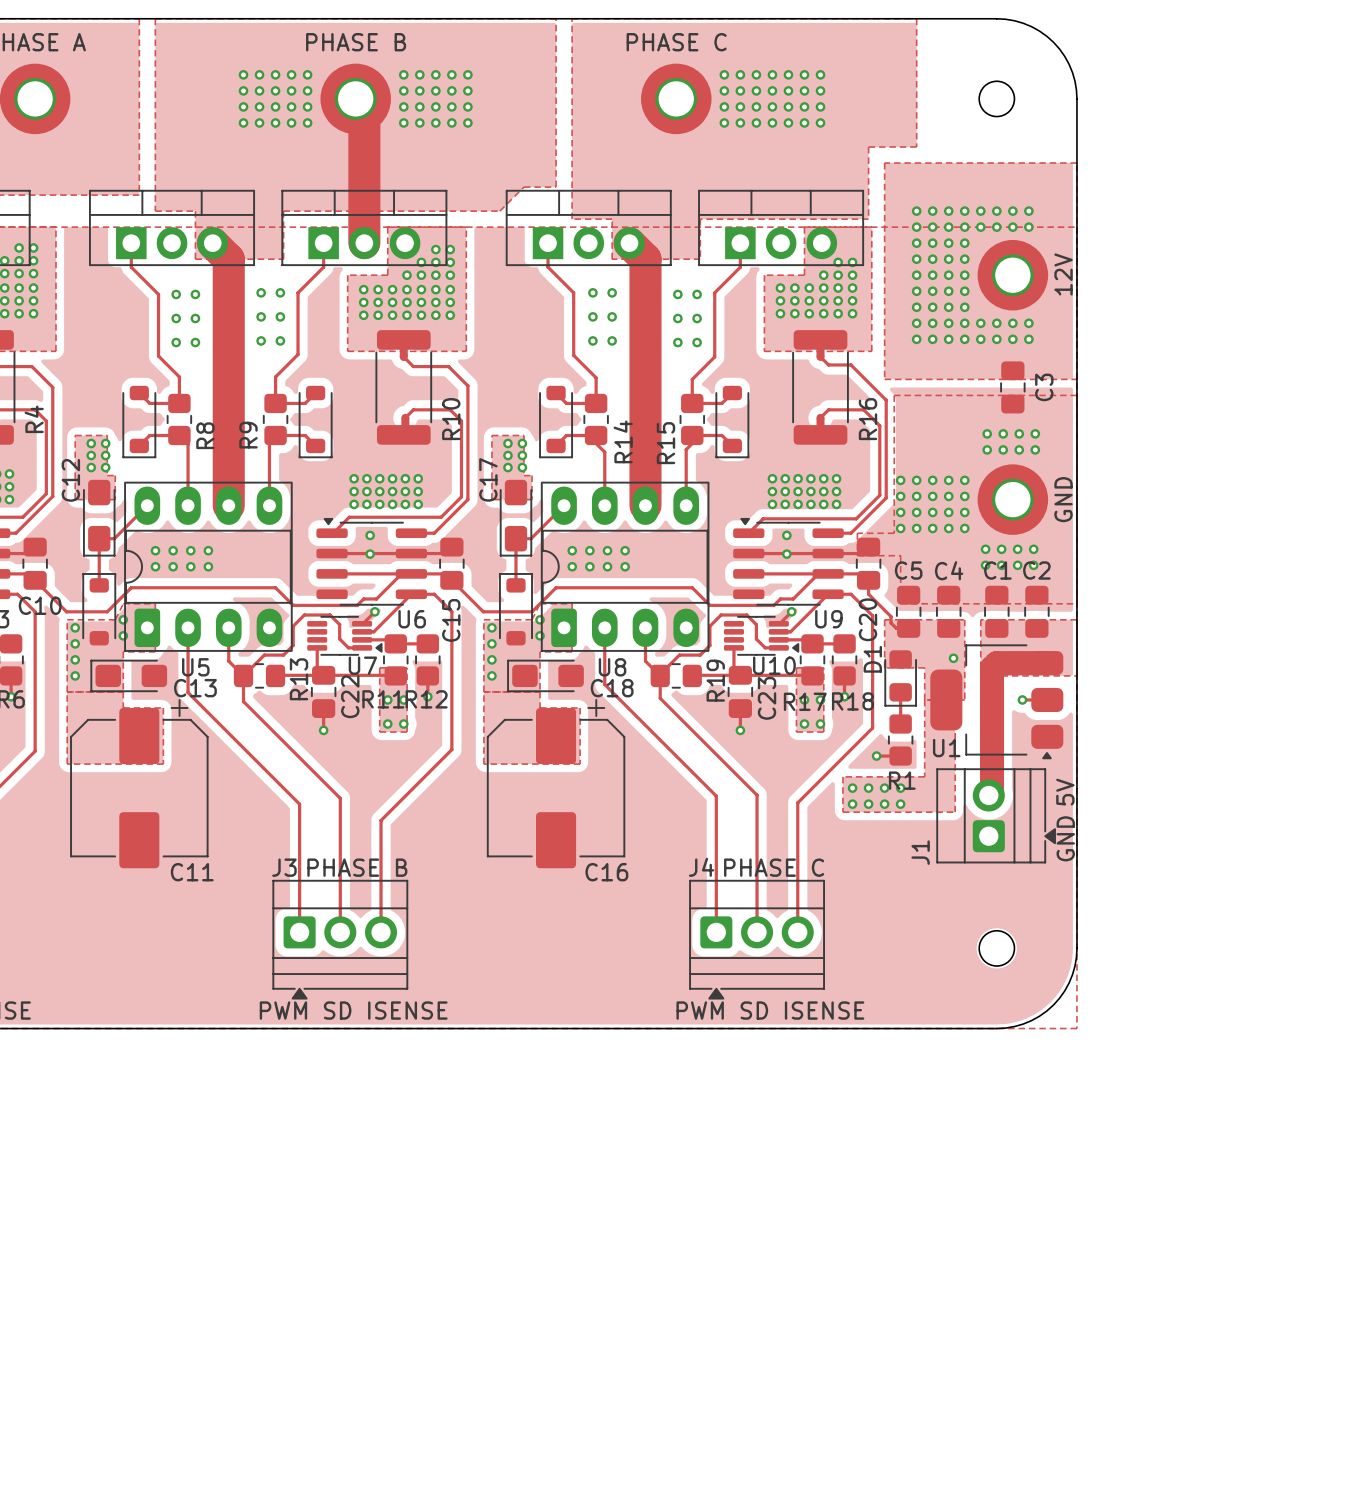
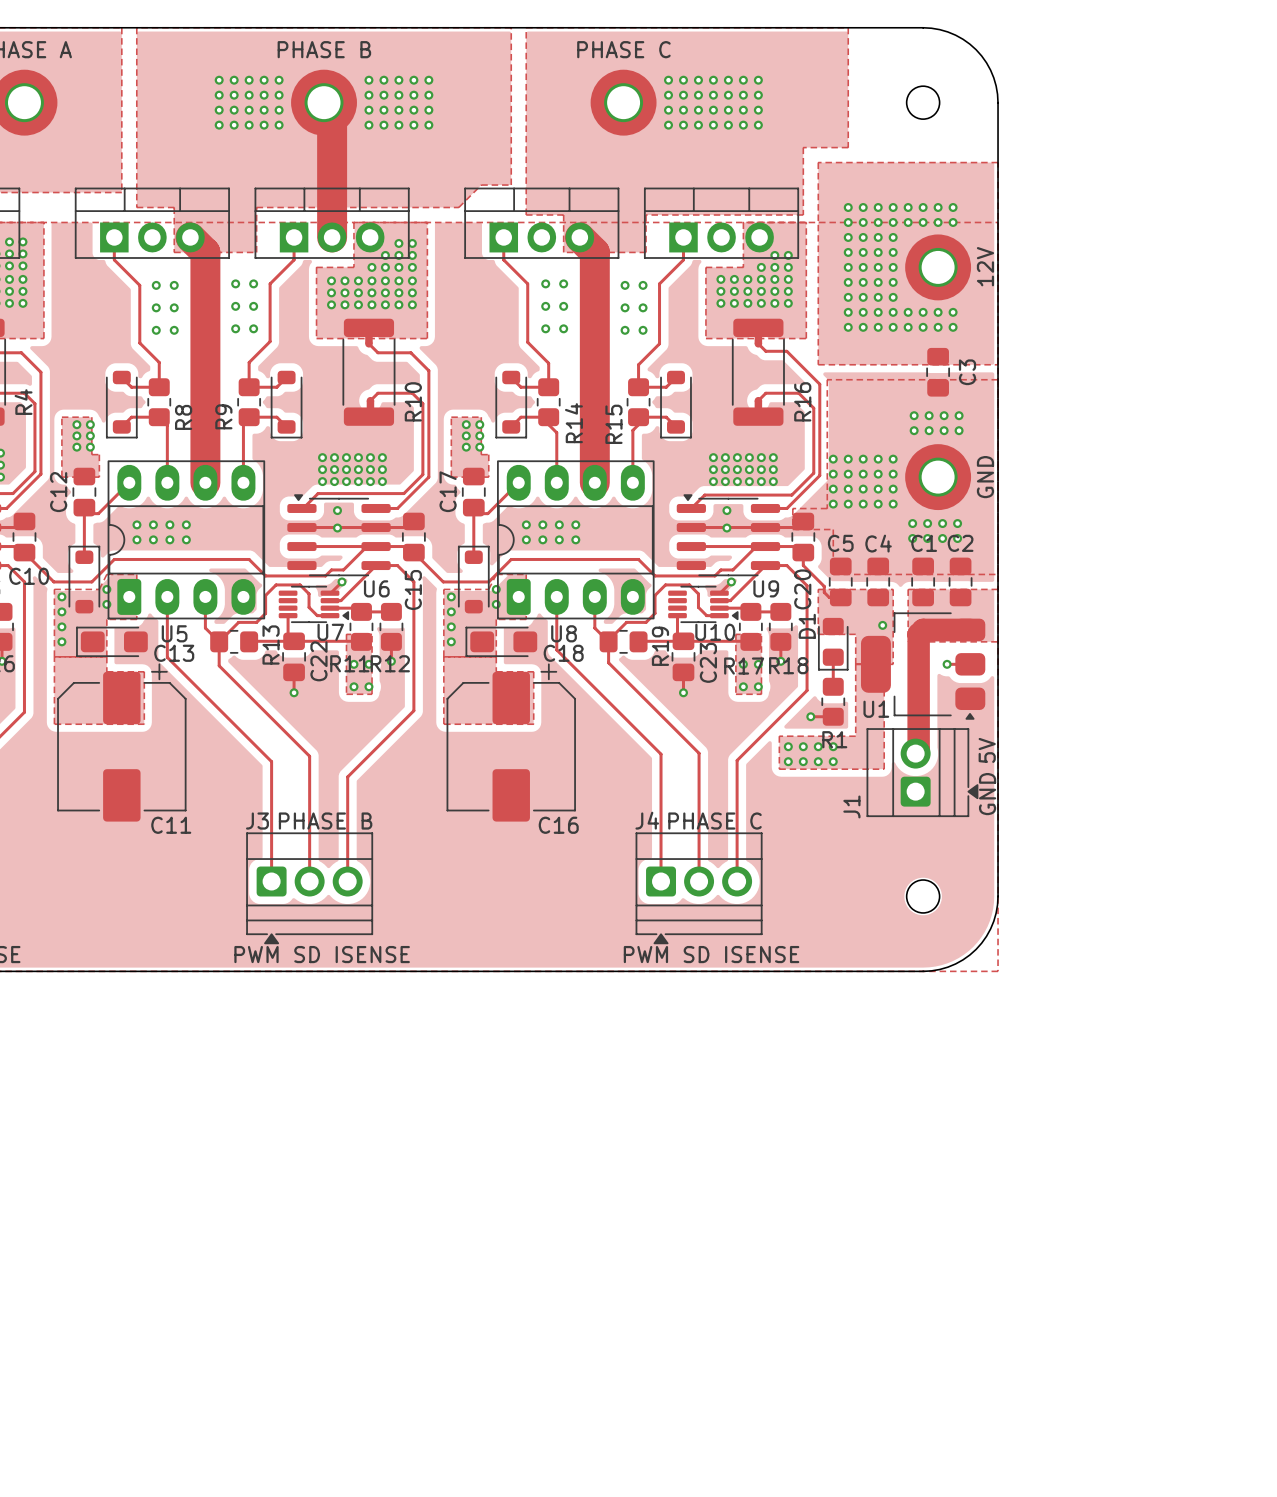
C12 footprint: [82, 479, 116, 557] -> [72, 467, 97, 517]
C17 name position: C17 (488, 479) -> C17 (448, 491)
C17 footprint: [499, 479, 533, 557] -> [461, 467, 486, 517]
C12 name position: C12 (70, 480) -> C12 (58, 492)

